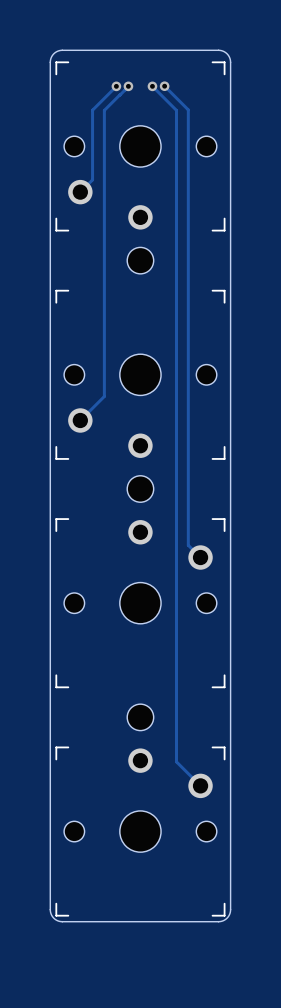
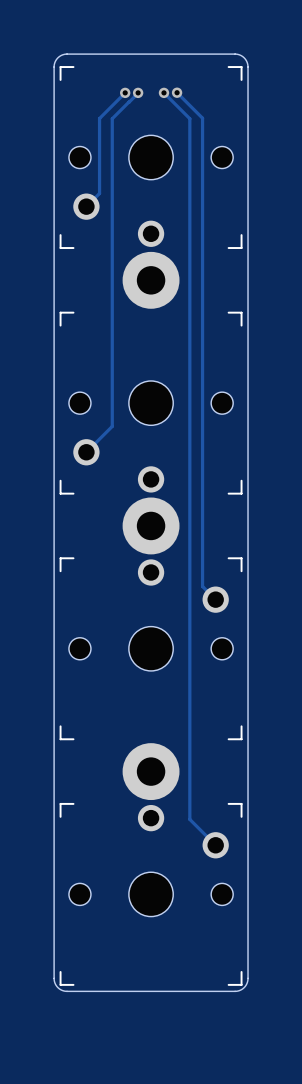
part footprint: [127, 247, 154, 274] -> [122, 251, 180, 309]
part footprint: [127, 475, 154, 503] -> [122, 497, 180, 555]
part footprint: [127, 704, 154, 731] -> [122, 743, 180, 801]

